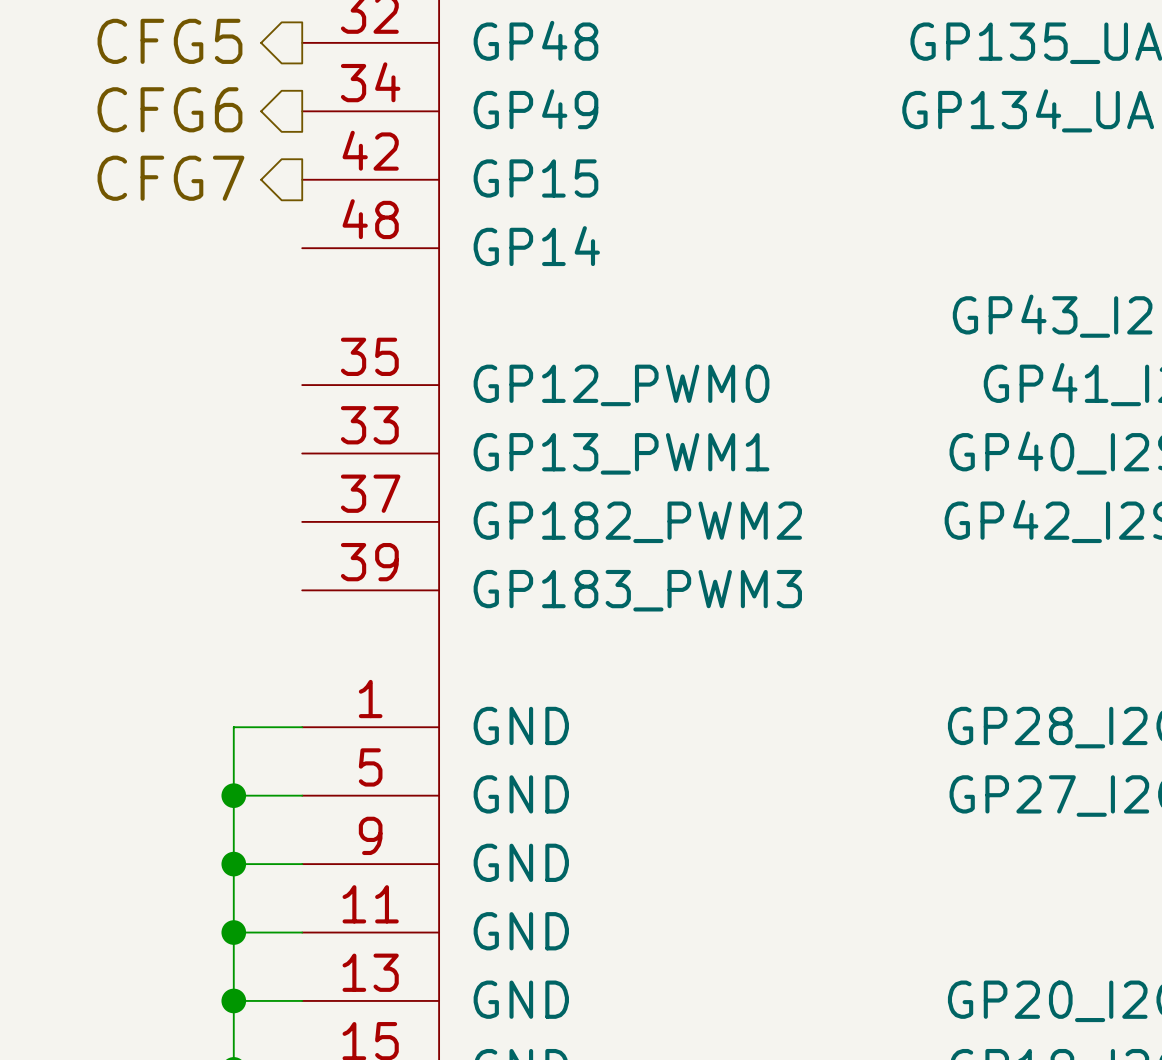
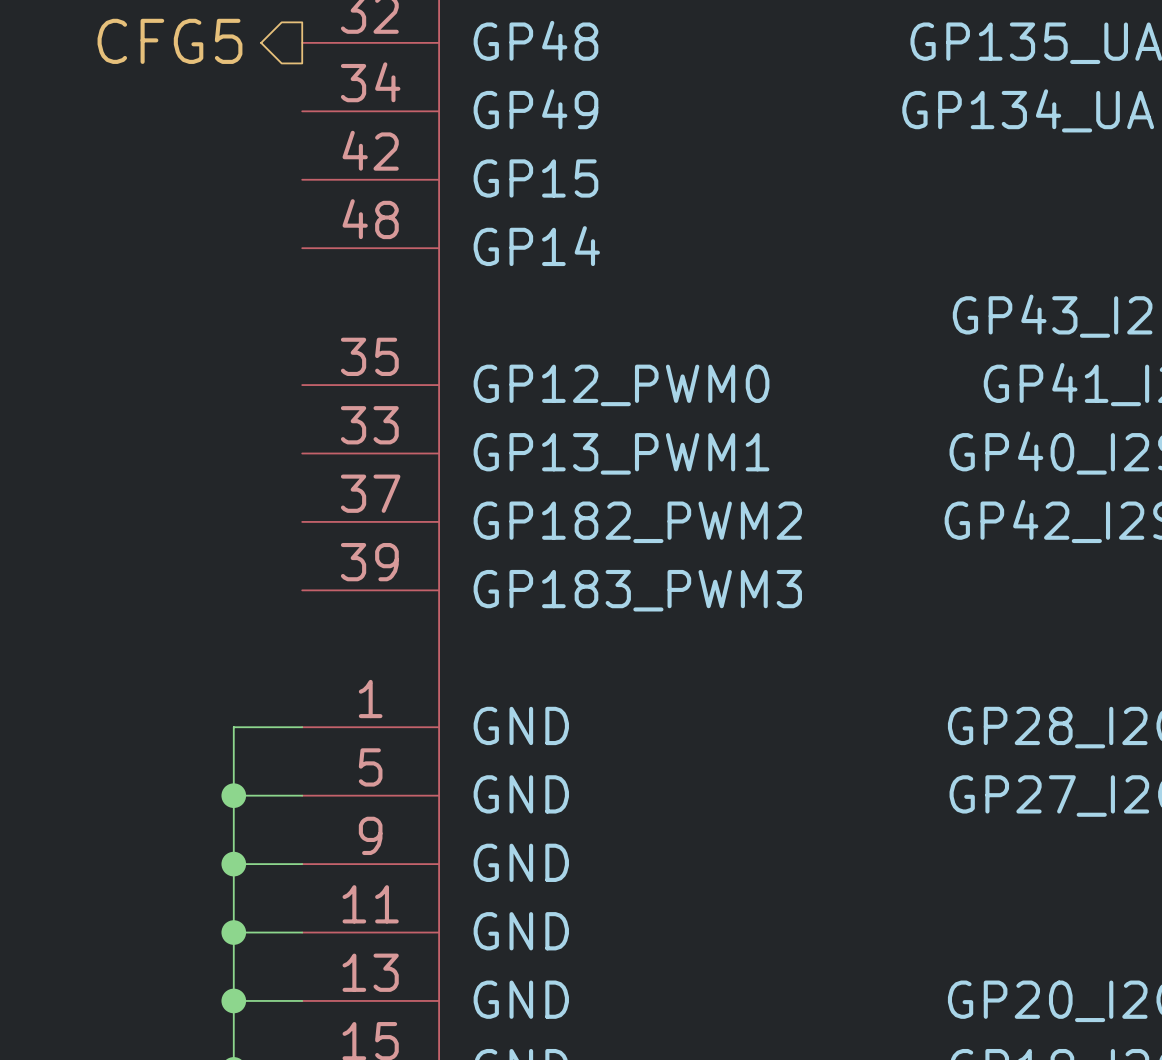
hierarchical label: CFG6 (169, 109) -> none
hierarchical label: CFG7 (170, 178) -> none

